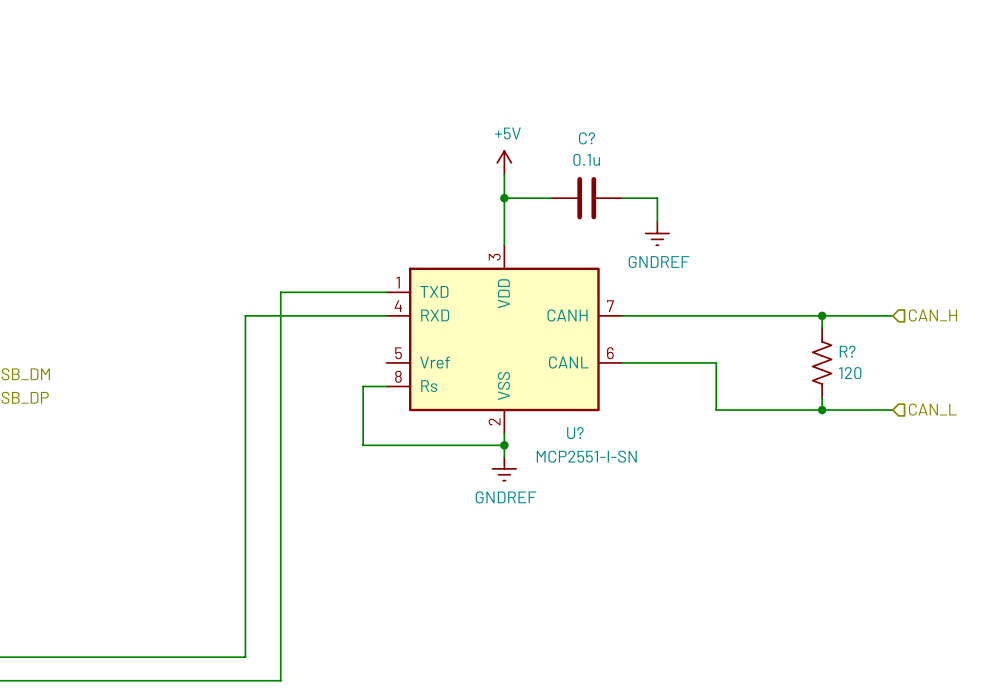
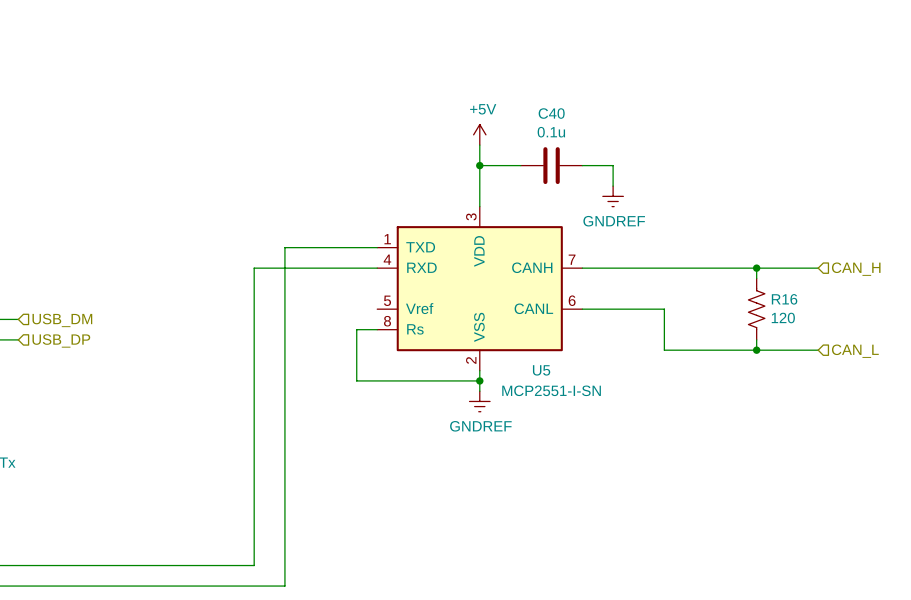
C? name: C? (586, 138) -> C40 (551, 113)
R? name: R? (847, 351) -> R16 (784, 299)
U? name: U? (575, 433) -> U5 (541, 370)

